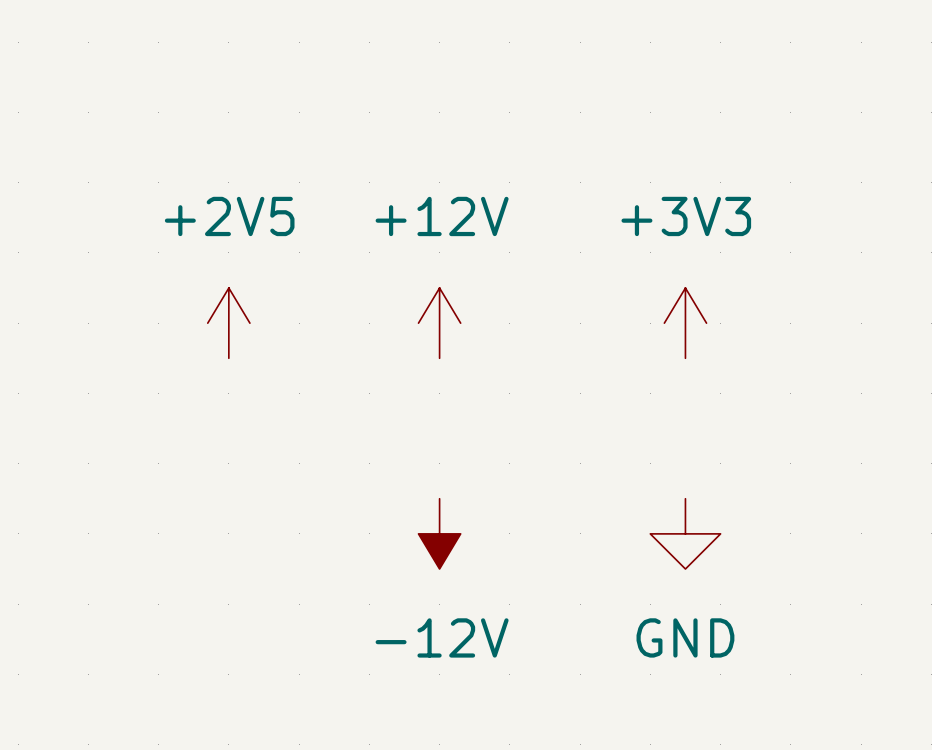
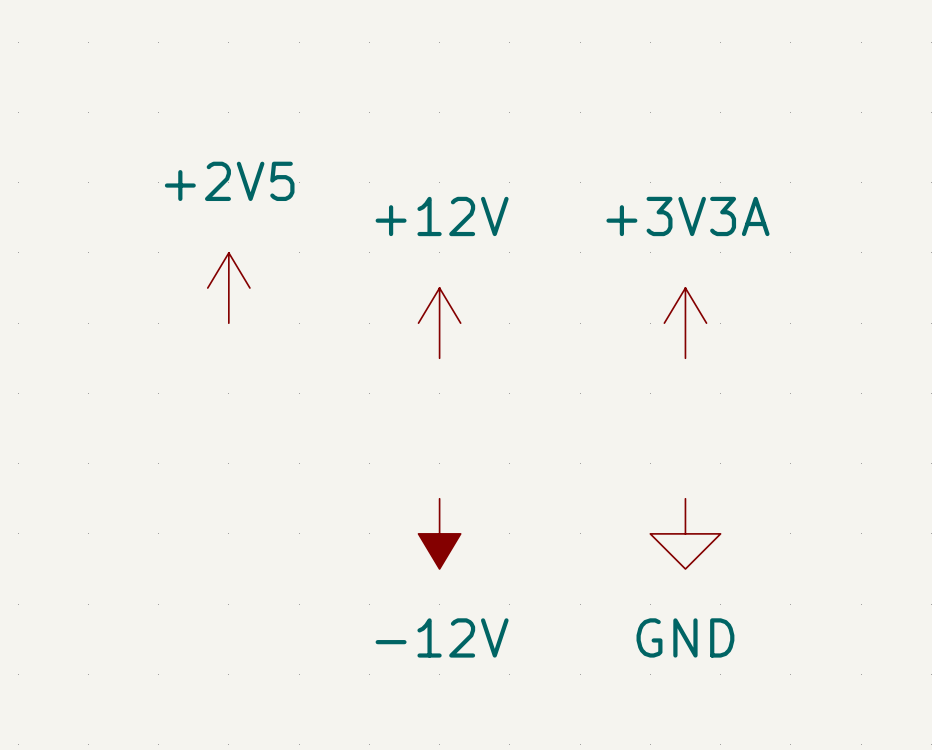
power symbol position: +2V5 (228, 323) -> +2V5 (228, 288)
power symbol: +3V3 (685, 323) -> +3V3A (685, 323)

